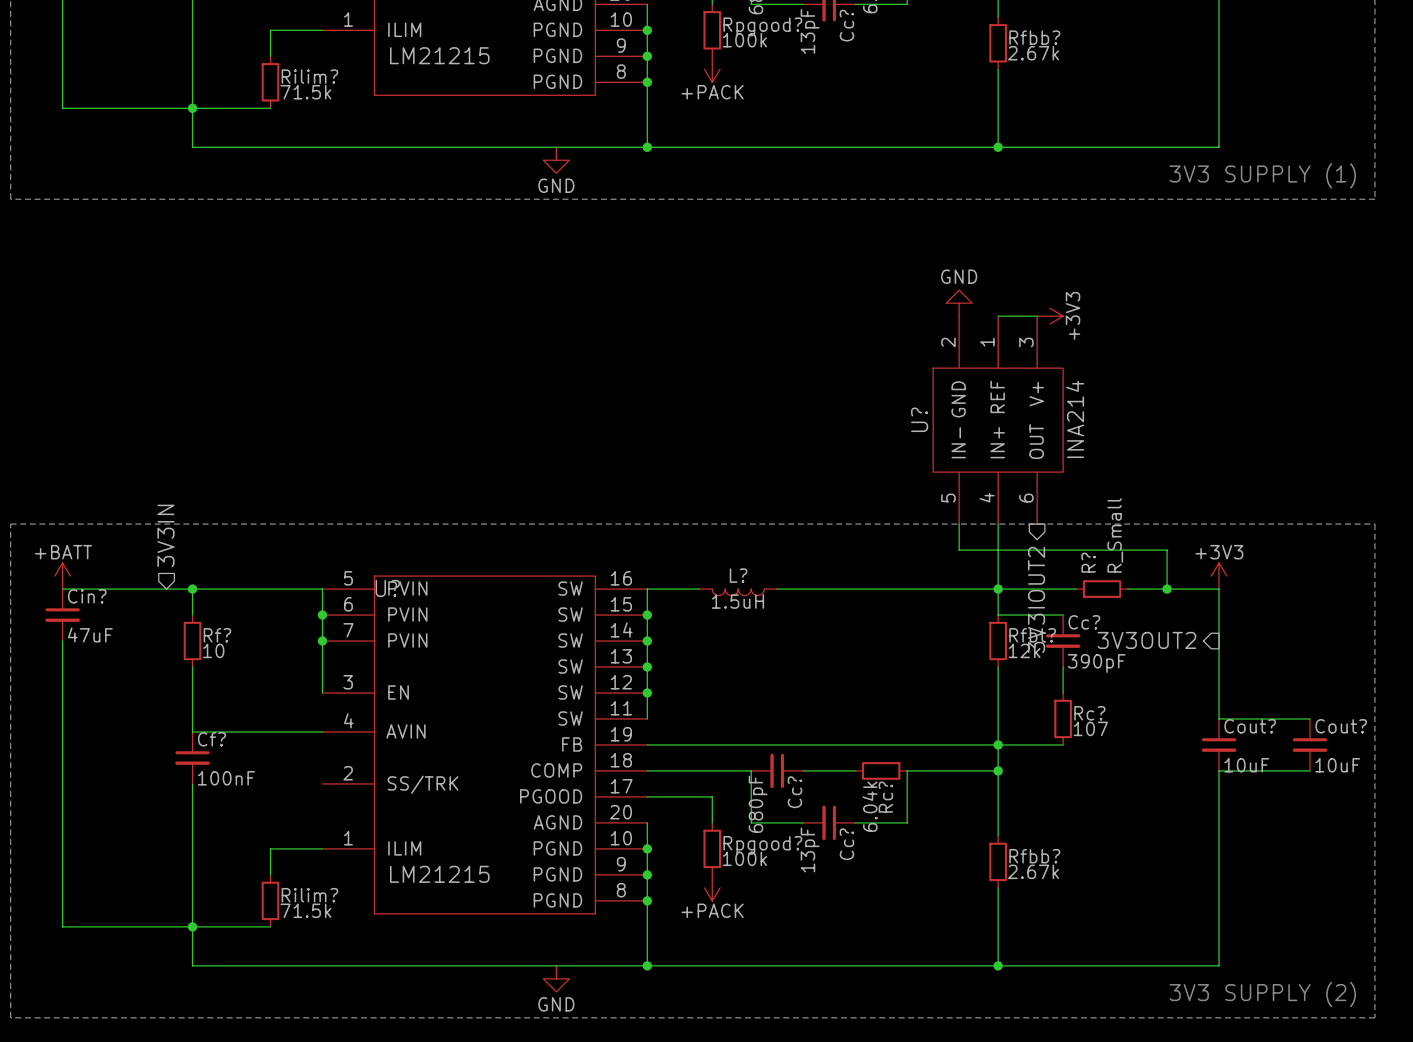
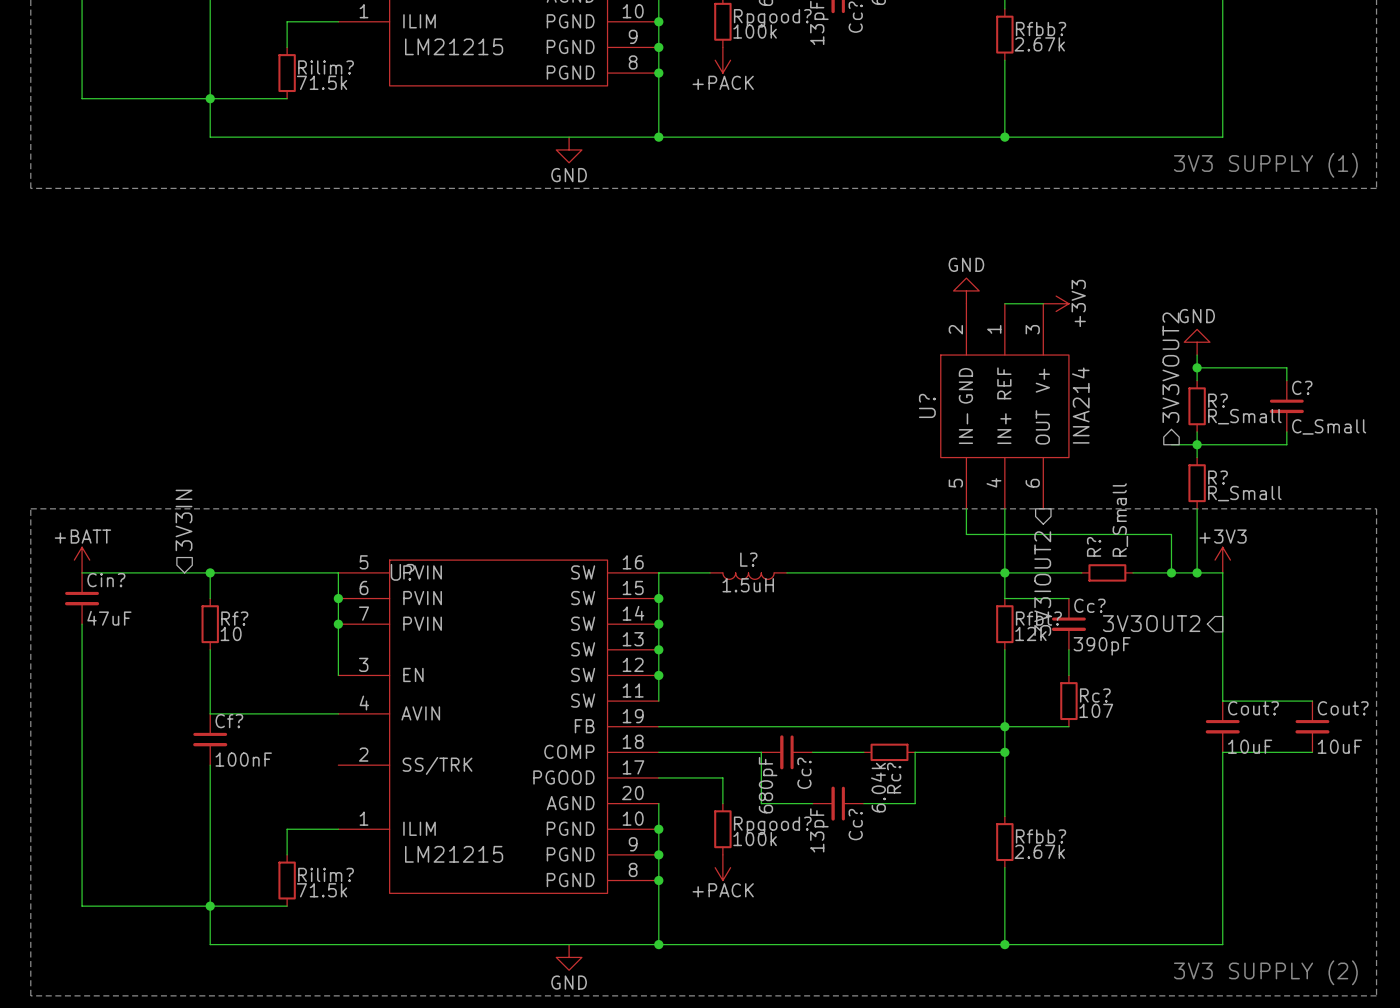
power symbol: none -> GND (1197, 342)
wire: none -> (1197, 355) (1197, 380)
hierarchical label: none -> 3V3VOUT2 (1170, 367)
wire: none -> (1197, 367) (1286, 367) (1286, 380)
junction: none -> (1197, 367)
R?: none -> R_Small (1197, 406)
C?: none -> C_Small (1286, 406)
wire: none -> (1197, 431) (1197, 457)
wire: none -> (1286, 431) (1286, 444) (1171, 444)
junction: none -> (1197, 444)
R?: none -> R_Small (1197, 483)
wire: none -> (1197, 508) (1197, 572)
junction: none -> (1197, 572)

